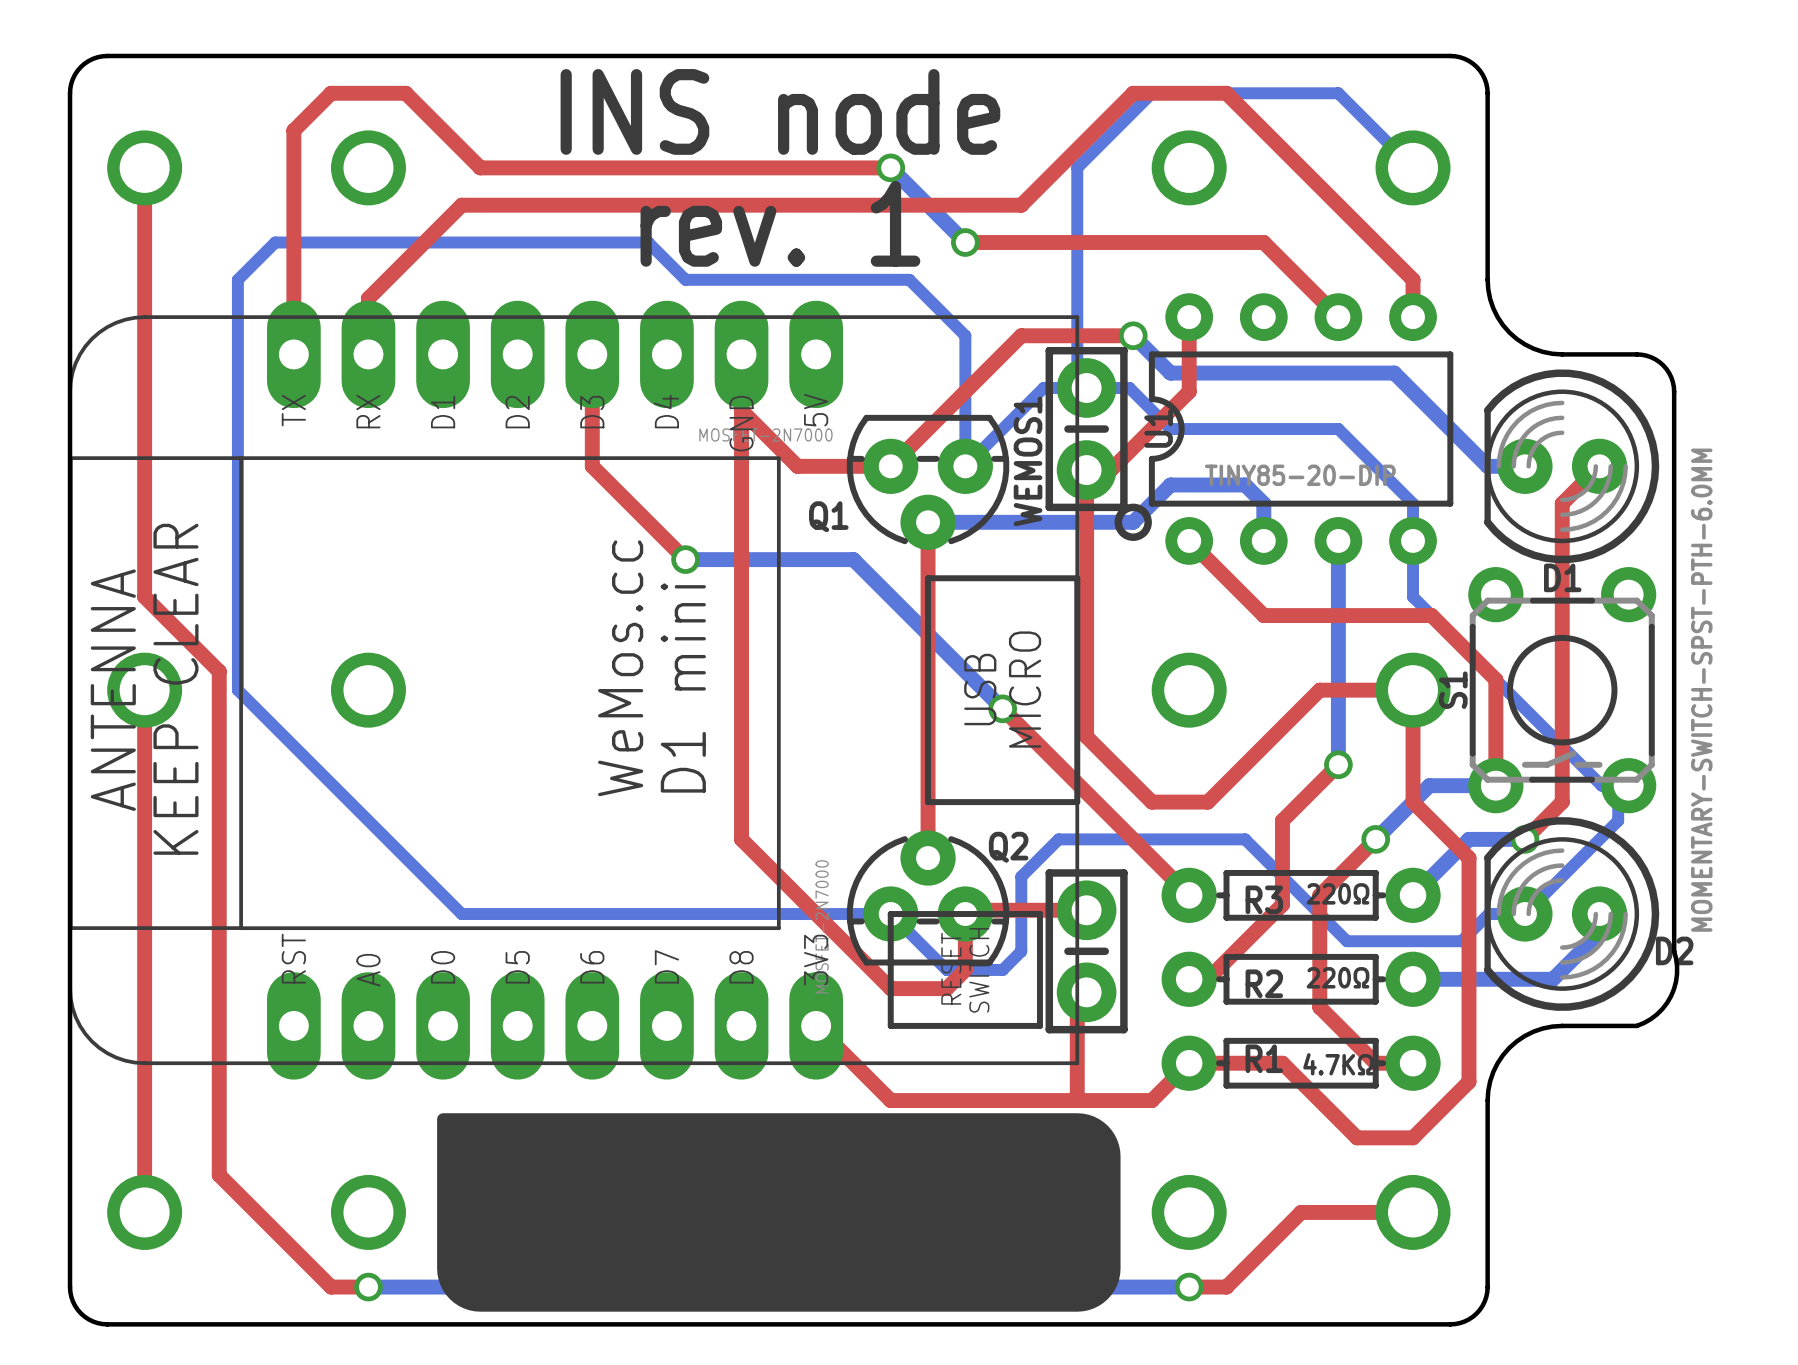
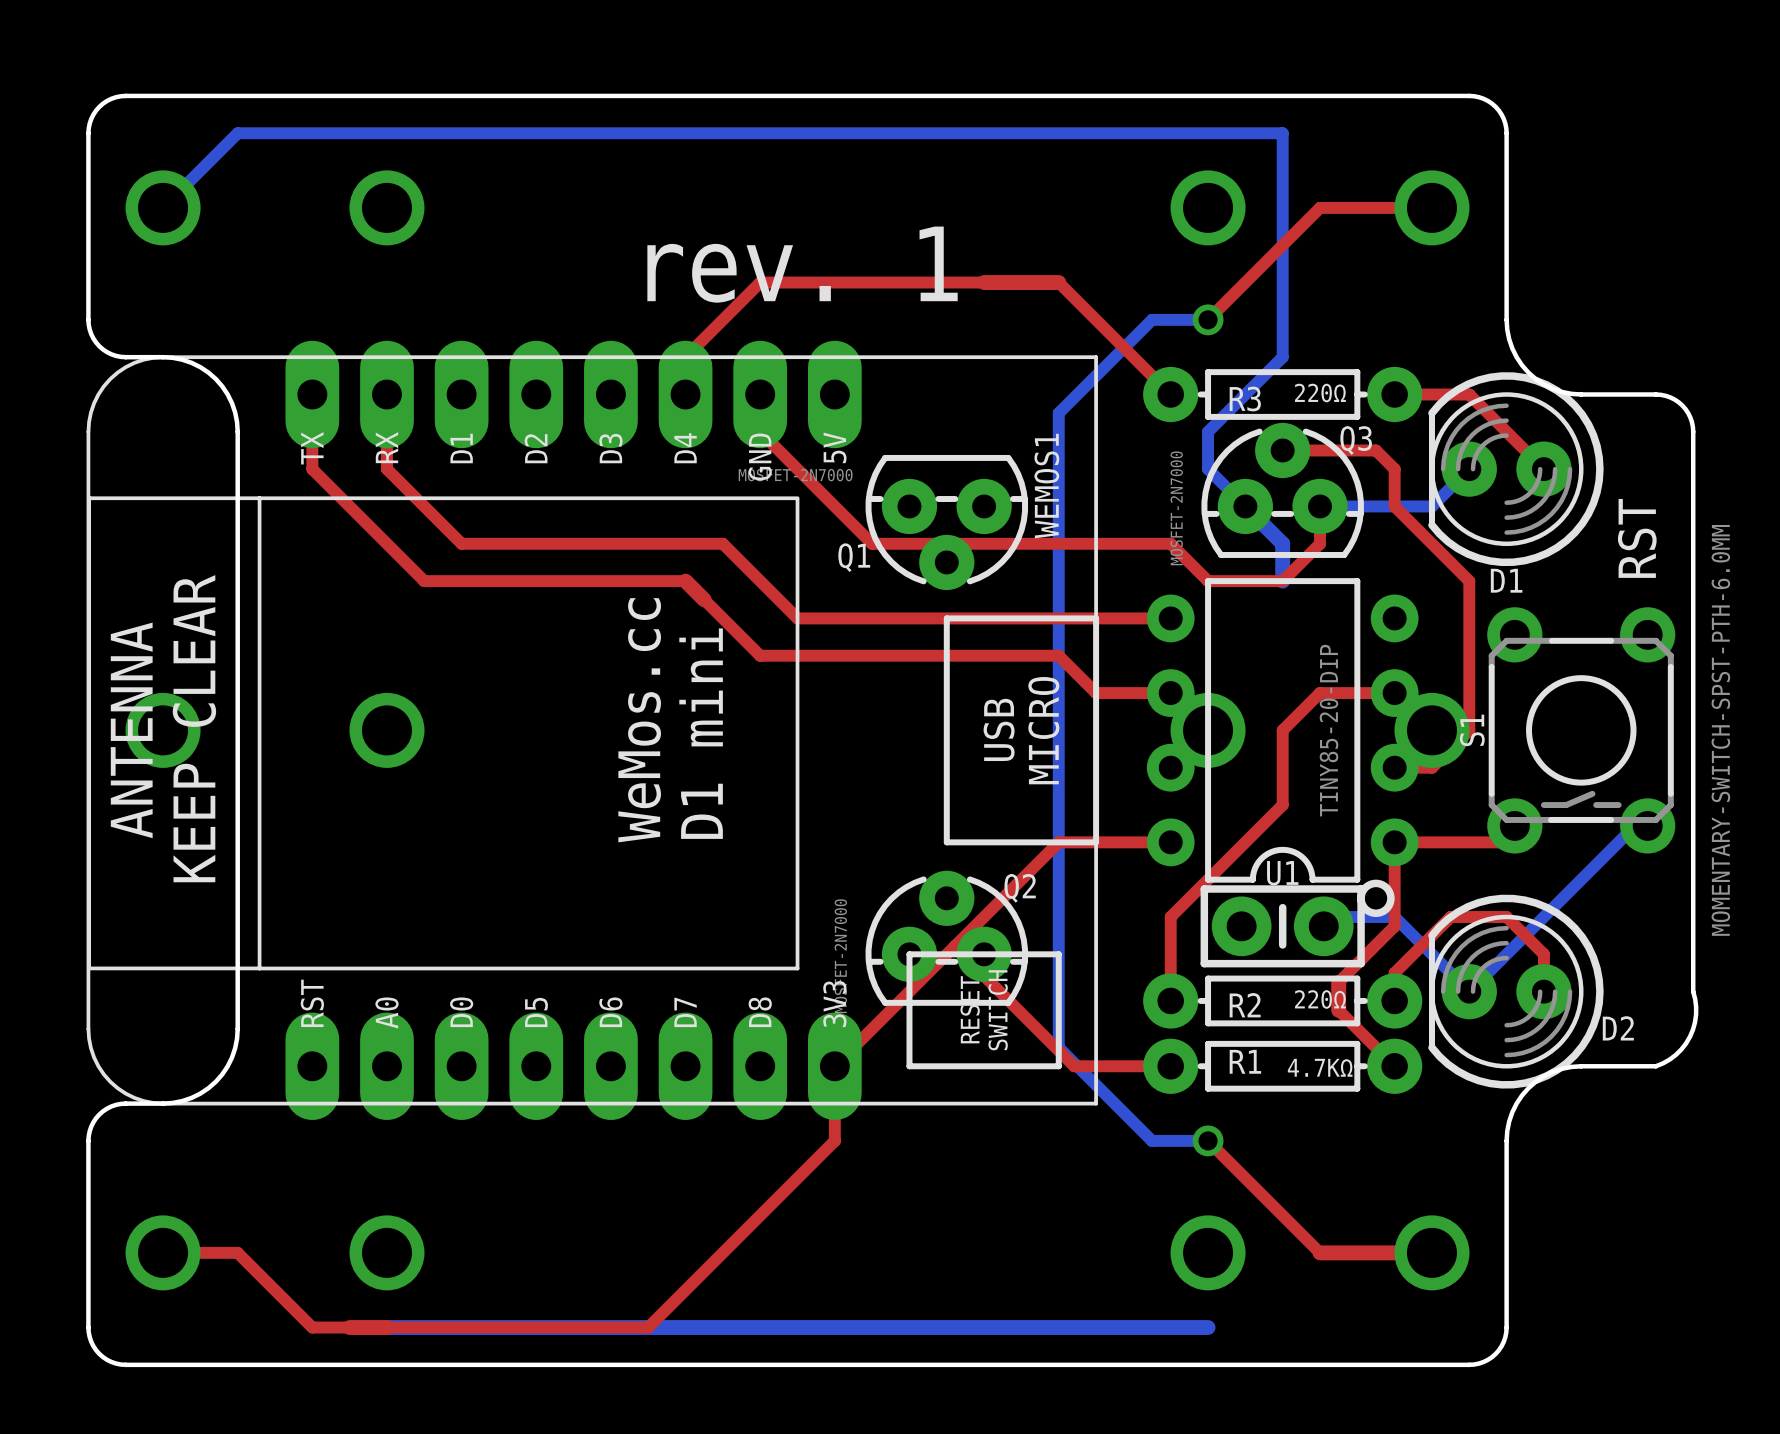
bottom track: (1151, 93) (1077, 167) (1077, 378) (1090, 391) -> (1170, 133) (237, 133) (163, 207)
bottom track: (1263, 93) (1338, 93) (1413, 167) -> (1282, 133) (1282, 357) (1208, 431) (1208, 469) (1264, 525)
text: INS node (780, 111) -> none
top track: (144, 167) (144, 596) (219, 671) (219, 1175) (331, 1287) -> none
top track: (890, 167) (480, 167) (405, 93) (331, 93) (293, 130) (293, 354) -> none
bottom track: (890, 167) (965, 242) -> none
via: (890, 167) -> none
top track: none -> (1431, 207) (1320, 207) (1208, 319)
top track: none -> (984, 282) (760, 282) (685, 357) (685, 394)
via: (965, 242) -> none
top track: (1039, 242) (1263, 242) (1338, 317) -> (1058, 282) (1170, 394)
board edge: (70, 279) (70, 1100) -> (88, 319) (93, 338) (103, 349) (111, 354) (125, 357) (172, 357) (191, 362) (208, 372) (222, 386) (232, 403) (237, 431) (237, 1028) (235, 1048) (222, 1074) (200, 1093) (172, 1102) (125, 1103) (111, 1106) (103, 1111) (93, 1122) (88, 1140)
bottom track: none -> (1208, 319) (1152, 319) (1058, 413) (1058, 1047) (1152, 1140) (1208, 1140)
via: none -> (1208, 319)
top track: (1189, 317) (1189, 391) (1110, 470) (1086, 470) (1086, 736) (1151, 802) (1207, 802) (1319, 690) (1413, 690) -> none
top track: (1413, 317) (1413, 279) (1226, 93) (1133, 93) (1021, 205) (461, 205) (368, 298) (368, 354) -> (1170, 618) (797, 618) (722, 543) (461, 543) (386, 469) (386, 394)
top track: (1133, 335) (1021, 335) (890, 466) (797, 466) (741, 410) -> none
bottom track: (1133, 335) (1170, 373) (1394, 373) (1487, 466) (1524, 466) -> none
via: (1133, 335) -> none
top track: (592, 354) (592, 466) (666, 540) -> (312, 394) (312, 469) (424, 581) (685, 581)
top track: none -> (1394, 394) (1469, 394) (1543, 469)
top track: (741, 391) (741, 839) (890, 988) (946, 988) (965, 969) (965, 914) (969, 910) (1086, 910) -> (760, 431) (872, 543) (1170, 543) (1208, 581) (1282, 581) (1320, 543) (1320, 506)
top track: none -> (1282, 450) (1375, 450) (1394, 469) (1394, 506) (1469, 581) (1469, 730) (1431, 767) (1394, 767)
part: (1086, 429) -> none
U1 rotation: 0° (1283, 429) -> 90° counterclockwise (1282, 747)
U1 position: (1283, 429) -> (1282, 747)
bottom track: none -> (1469, 469) (1431, 506) (1320, 506)
Q3: none -> MOSFET-2N7000 (1282, 490)
D1 position: (1571, 466) -> (1515, 469)
top track: (1599, 466) (1562, 503) (1562, 802) (1524, 839) -> none
bottom track: (1245, 484) (1170, 484) (1133, 522) (928, 522) -> none
text: none -> RST (1637, 538)
top track: (928, 522) (928, 858) -> none
top track: (1189, 540) (1263, 615) (1431, 615) (1495, 679) (1495, 785) -> (1394, 842) (1498, 842) (1514, 825)
bottom track: (1338, 540) (1338, 764) -> none
top track: none -> (704, 599) (760, 655) (1058, 655) (1096, 693) (1170, 693)
bottom track: (685, 559) (853, 559) (1002, 708) -> none
via: (685, 559) -> none
top track: none -> (1394, 693) (1320, 693) (1282, 730) (1282, 805) (1170, 916) (1170, 1000)
top track: (144, 690) (144, 1212) -> (349, 1327) (312, 1327) (237, 1252) (163, 1252)
top track: (1412, 690) (1413, 802) (1468, 858) (1468, 1081) (1413, 1137) (1357, 1137) (1282, 1063) (1189, 1063) (1151, 1100) (890, 1100) (816, 1025) -> none
top track: (1002, 708) (1189, 895) -> none
via: (1002, 708) -> none
top track: (1338, 764) (1282, 820) (1282, 904) (1207, 979) (1189, 979) -> none
via: (1338, 764) -> none
bottom track: (1495, 785) (1429, 785) (1375, 839) -> none
bottom track: (1615, 785) (1601, 785) (1413, 596) (1413, 503) (1338, 429) (1170, 429) (1129, 388) (1043, 388) (965, 466) (965, 335) (909, 279) (685, 279) (648, 242) (275, 242) (237, 279) (237, 690) (461, 914) (911, 914) -> (1635, 825) (1469, 991) (1394, 916) (1333, 916) (1323, 926)
bottom track: (1628, 785) (1618, 796) (1618, 820) (1524, 914) (1488, 914) (1461, 941) (1346, 941) (1245, 839) (1058, 839) (1021, 876) (1021, 951) (1002, 969) (946, 969) (890, 914) -> none
top track: none -> (1170, 842) (1058, 842) (834, 1066) (834, 1140) (648, 1327) (386, 1327)
top track: (1375, 839) (1319, 895) (1319, 941) -> (1399, 842) (1394, 846) (1394, 926) (1338, 982)
via: (1375, 839) -> none
bottom track: (1524, 839) (1468, 839) (1413, 895) -> none
via: (1524, 839) -> none
R3 position: (1301, 895) -> (1282, 394)
top track: none -> (954, 946) (1074, 1066) (1170, 1066)
D2 position: (1571, 914) -> (1515, 991)
bottom track: (1599, 914) (1599, 932) (1552, 979) (1413, 979) -> none
part rotation: 0° (1086, 951) -> 90° clockwise (1282, 926)
part position: (1086, 951) -> (1282, 926)
top track: none -> (1543, 991) (1543, 954) (1506, 916) (1450, 916) (1394, 972) (1394, 1000)
top track: (1319, 969) (1319, 1007) (1375, 1063) (1413, 1063) -> (1338, 1010) (1394, 1066)
R2 position: (1301, 979) -> (1282, 1000)
top track: (1086, 992) (1077, 1001) (1077, 1100) -> none
R1 position: (1301, 1063) -> (1282, 1066)
via: none -> (1208, 1140)
drawing: [437, 1113, 1121, 1312] -> none
top track: (1301, 1212) (1226, 1287) (1189, 1287) -> (1320, 1252) (1208, 1140)
via: (368, 1287) -> none
via: (1189, 1287) -> none

